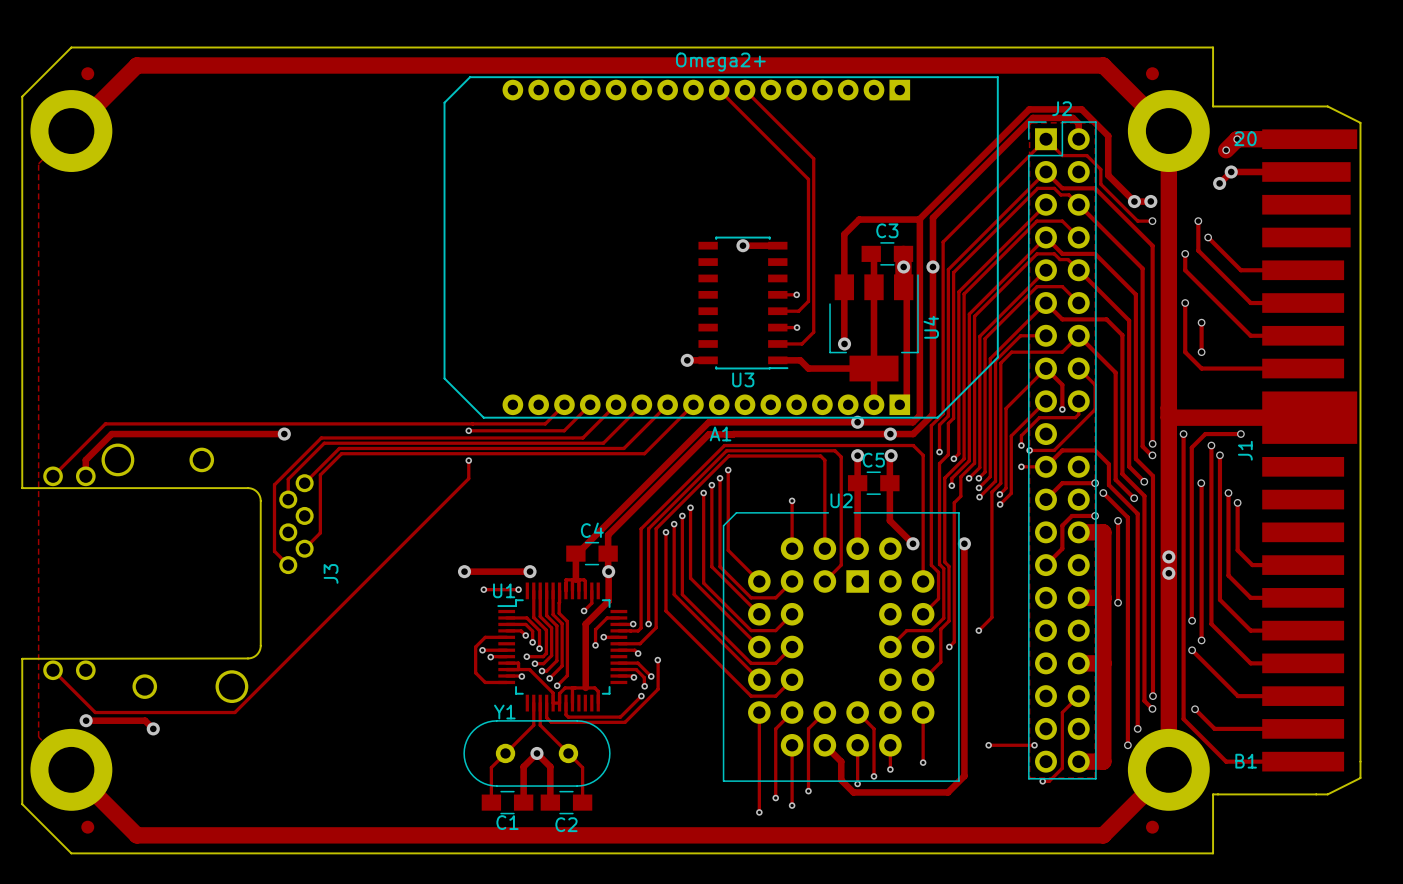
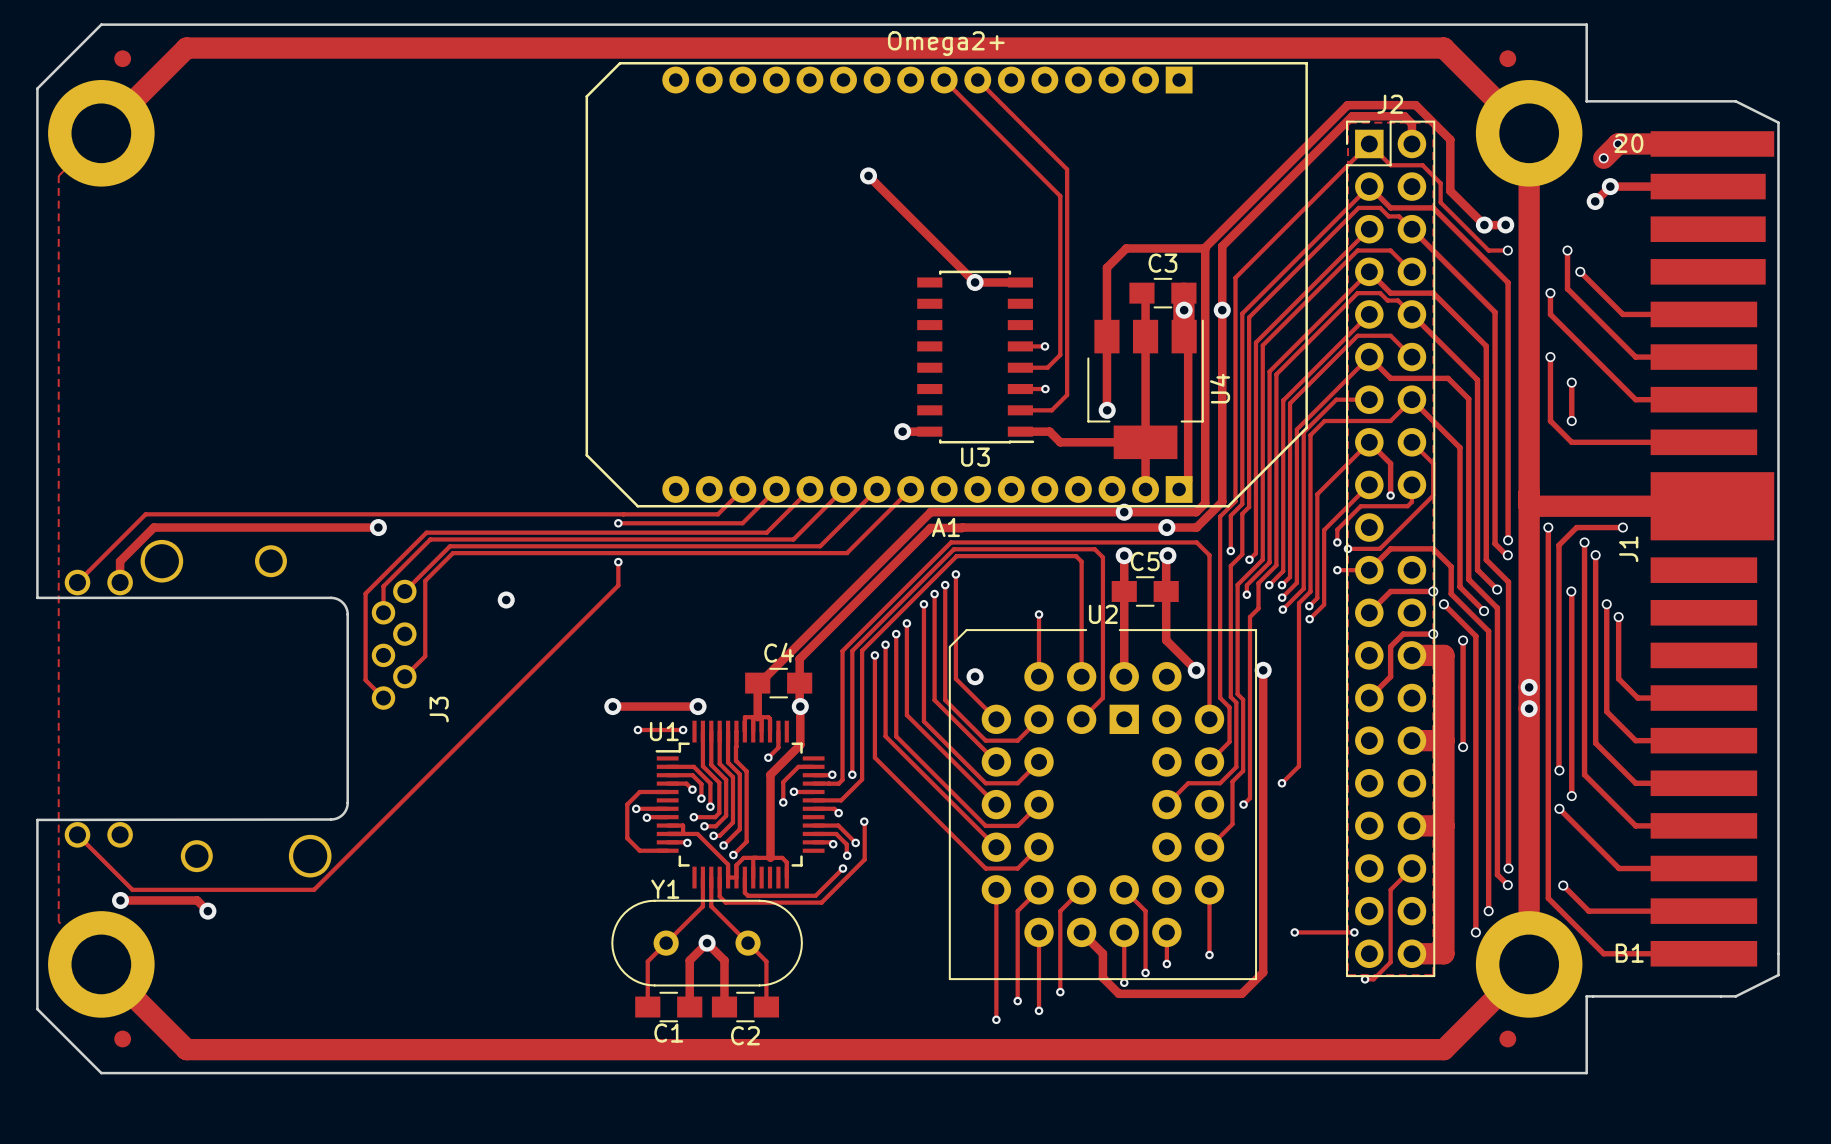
track: none -> (868, 175) (975, 282)
via: none -> (868, 175)
via: none -> (506, 600)
via: none -> (975, 676)

